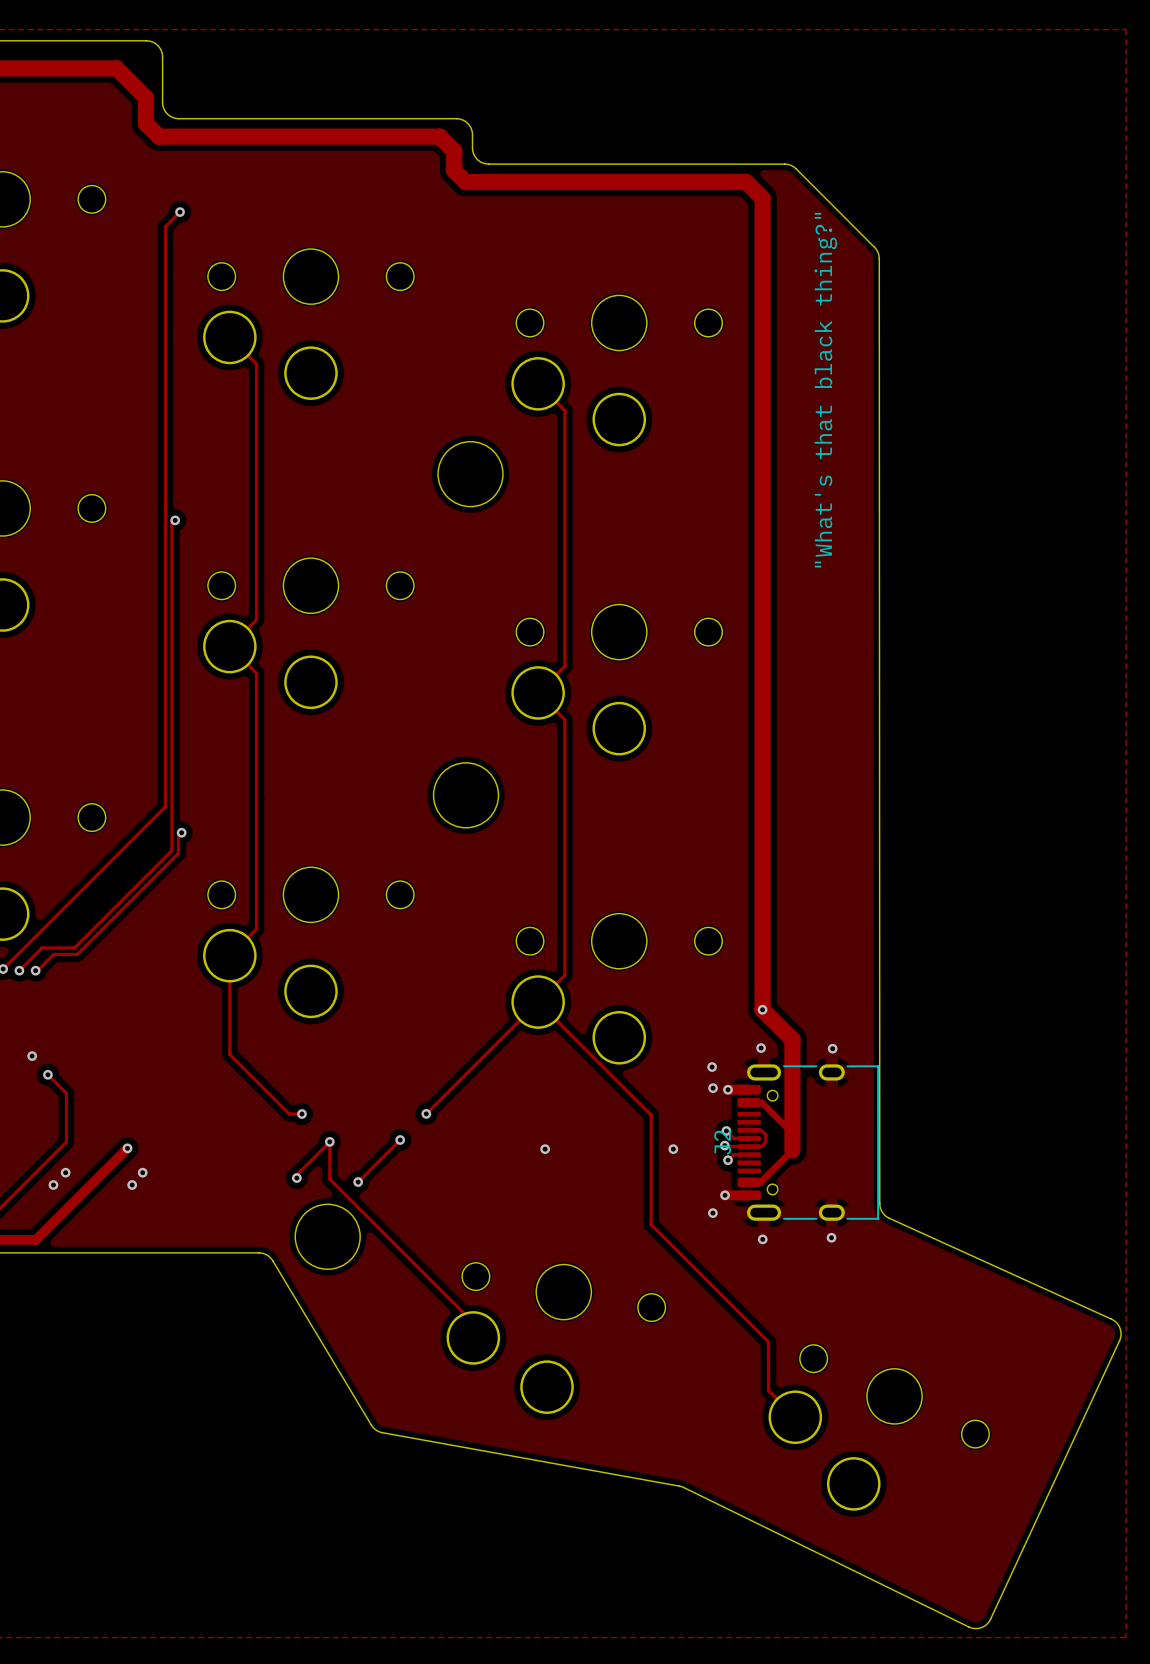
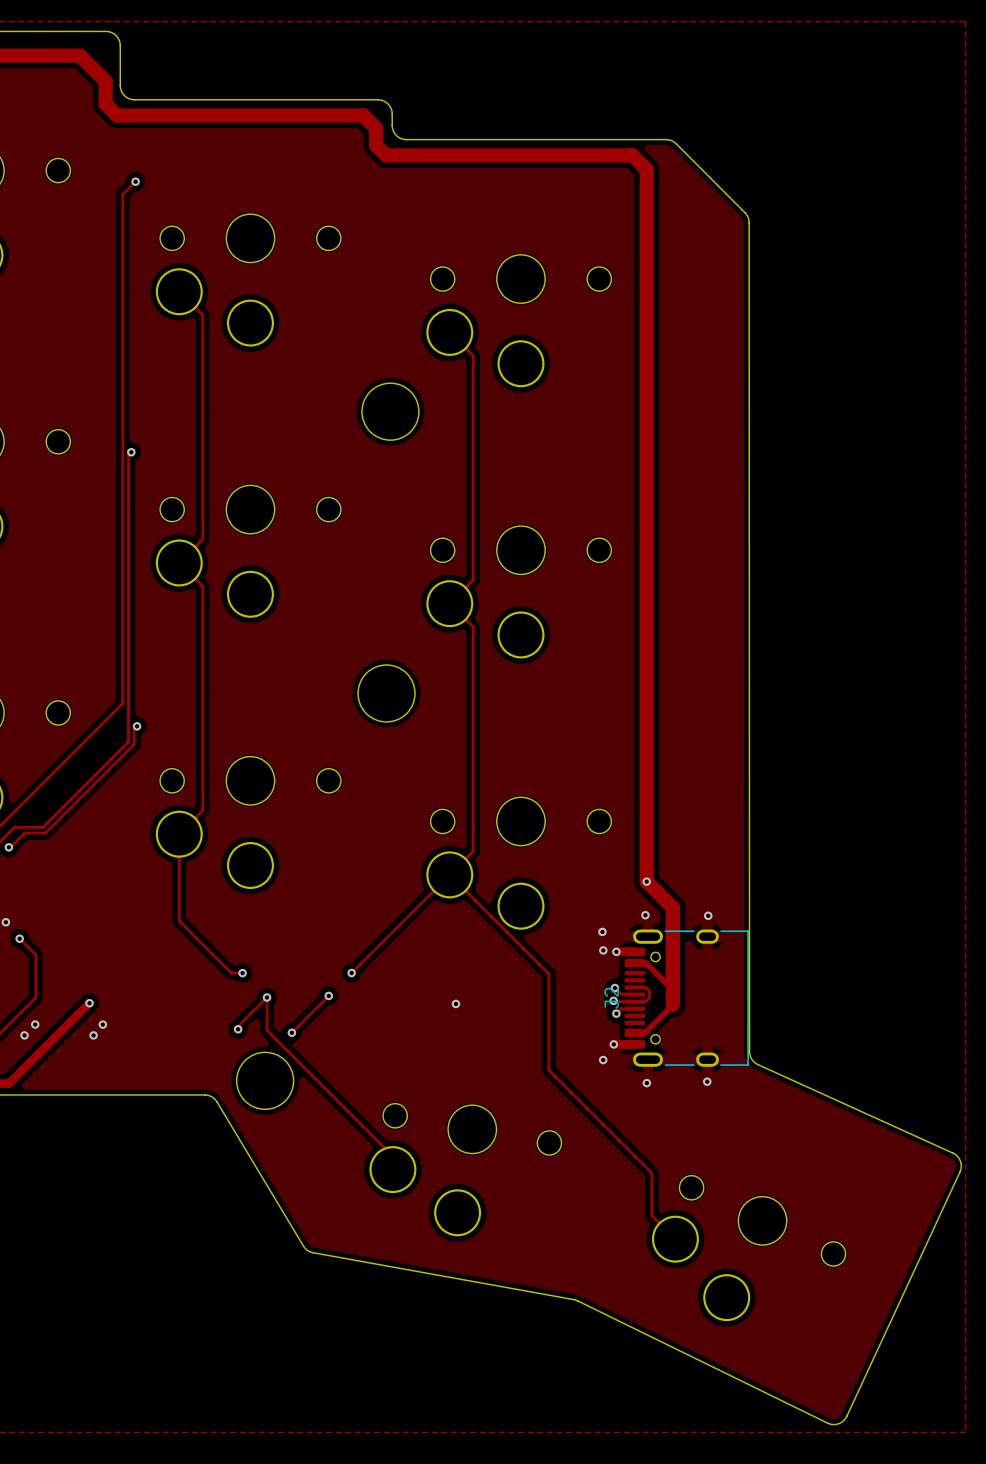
text: "What's that black thing?" (825, 390) -> none
via: (673, 1149) -> none

